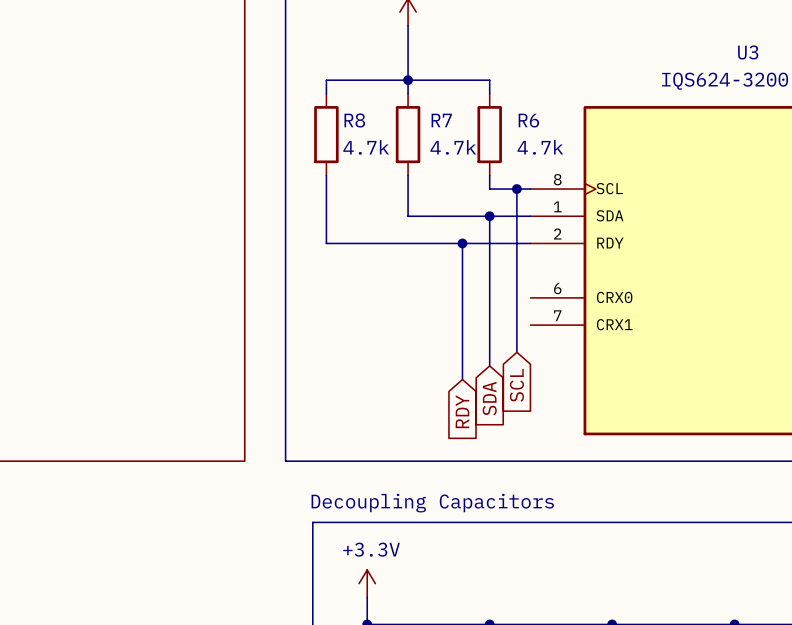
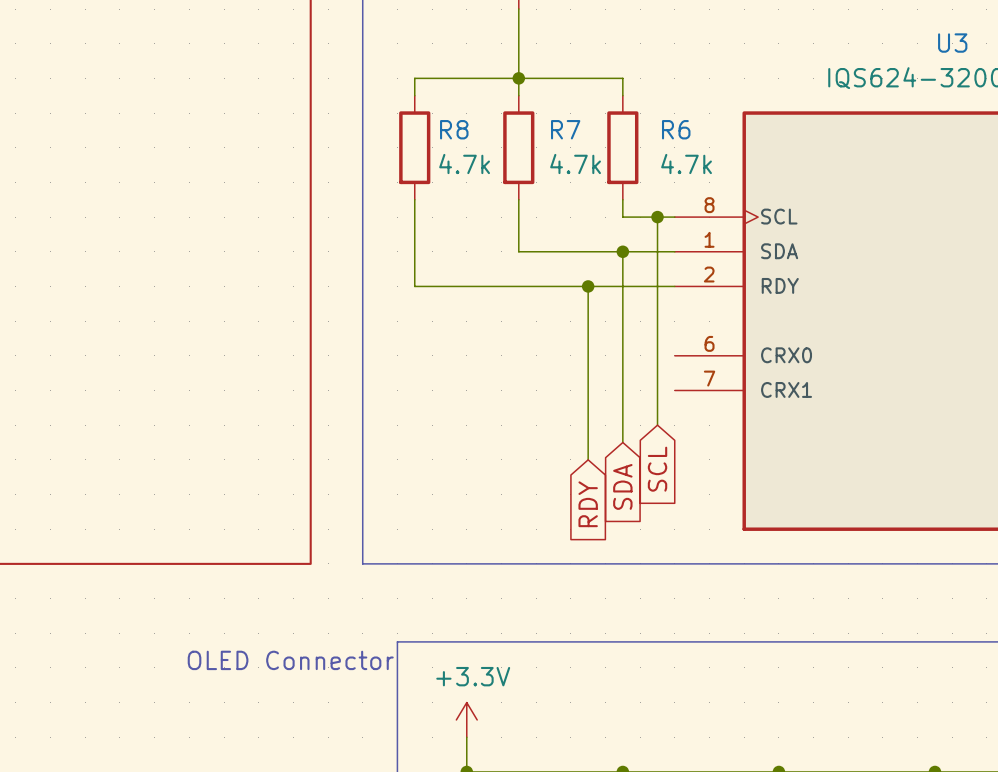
text: Decoupling Capacitors (432, 503) -> none
text: none -> OLED Connector (290, 660)

